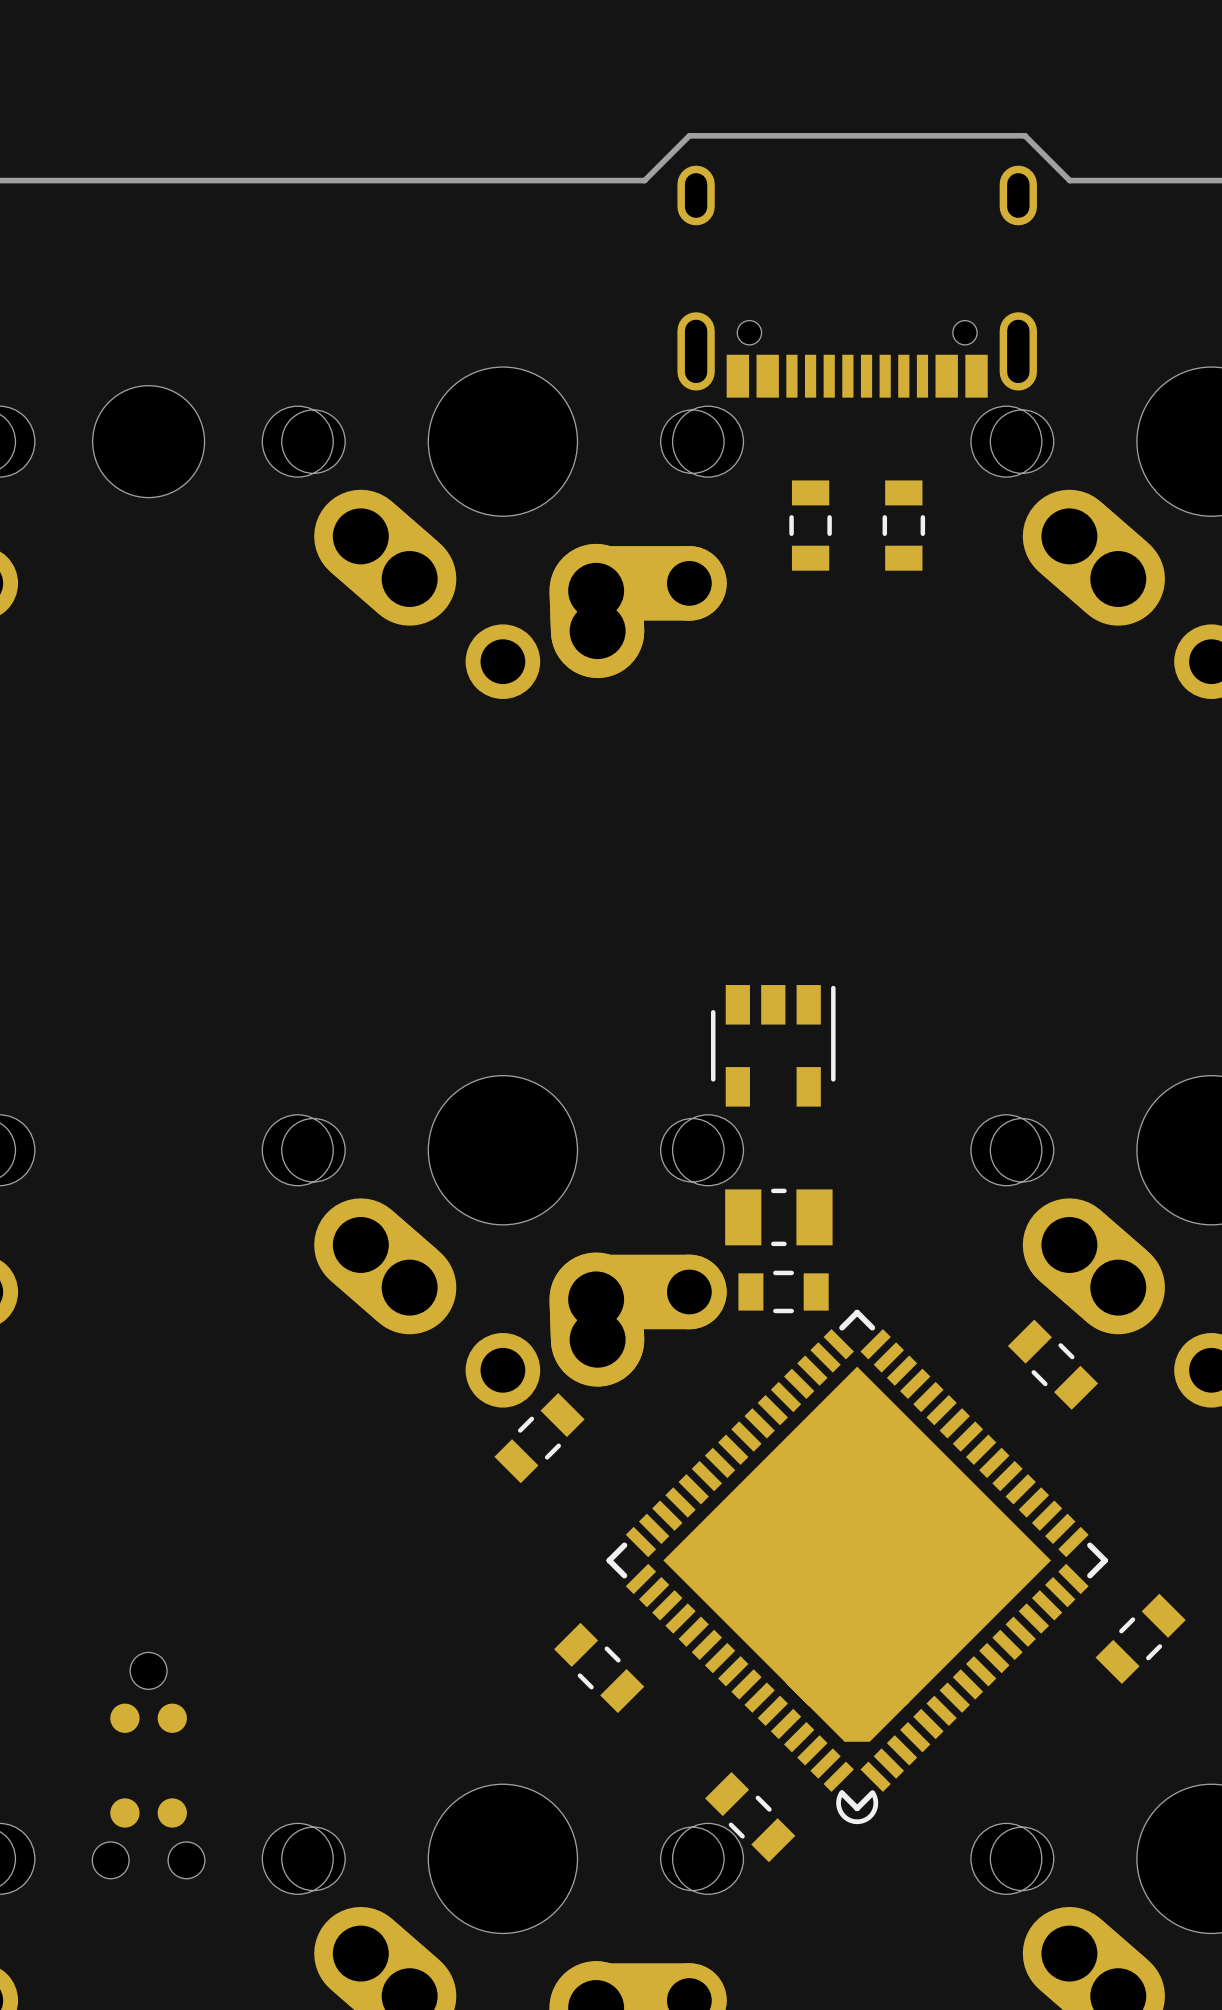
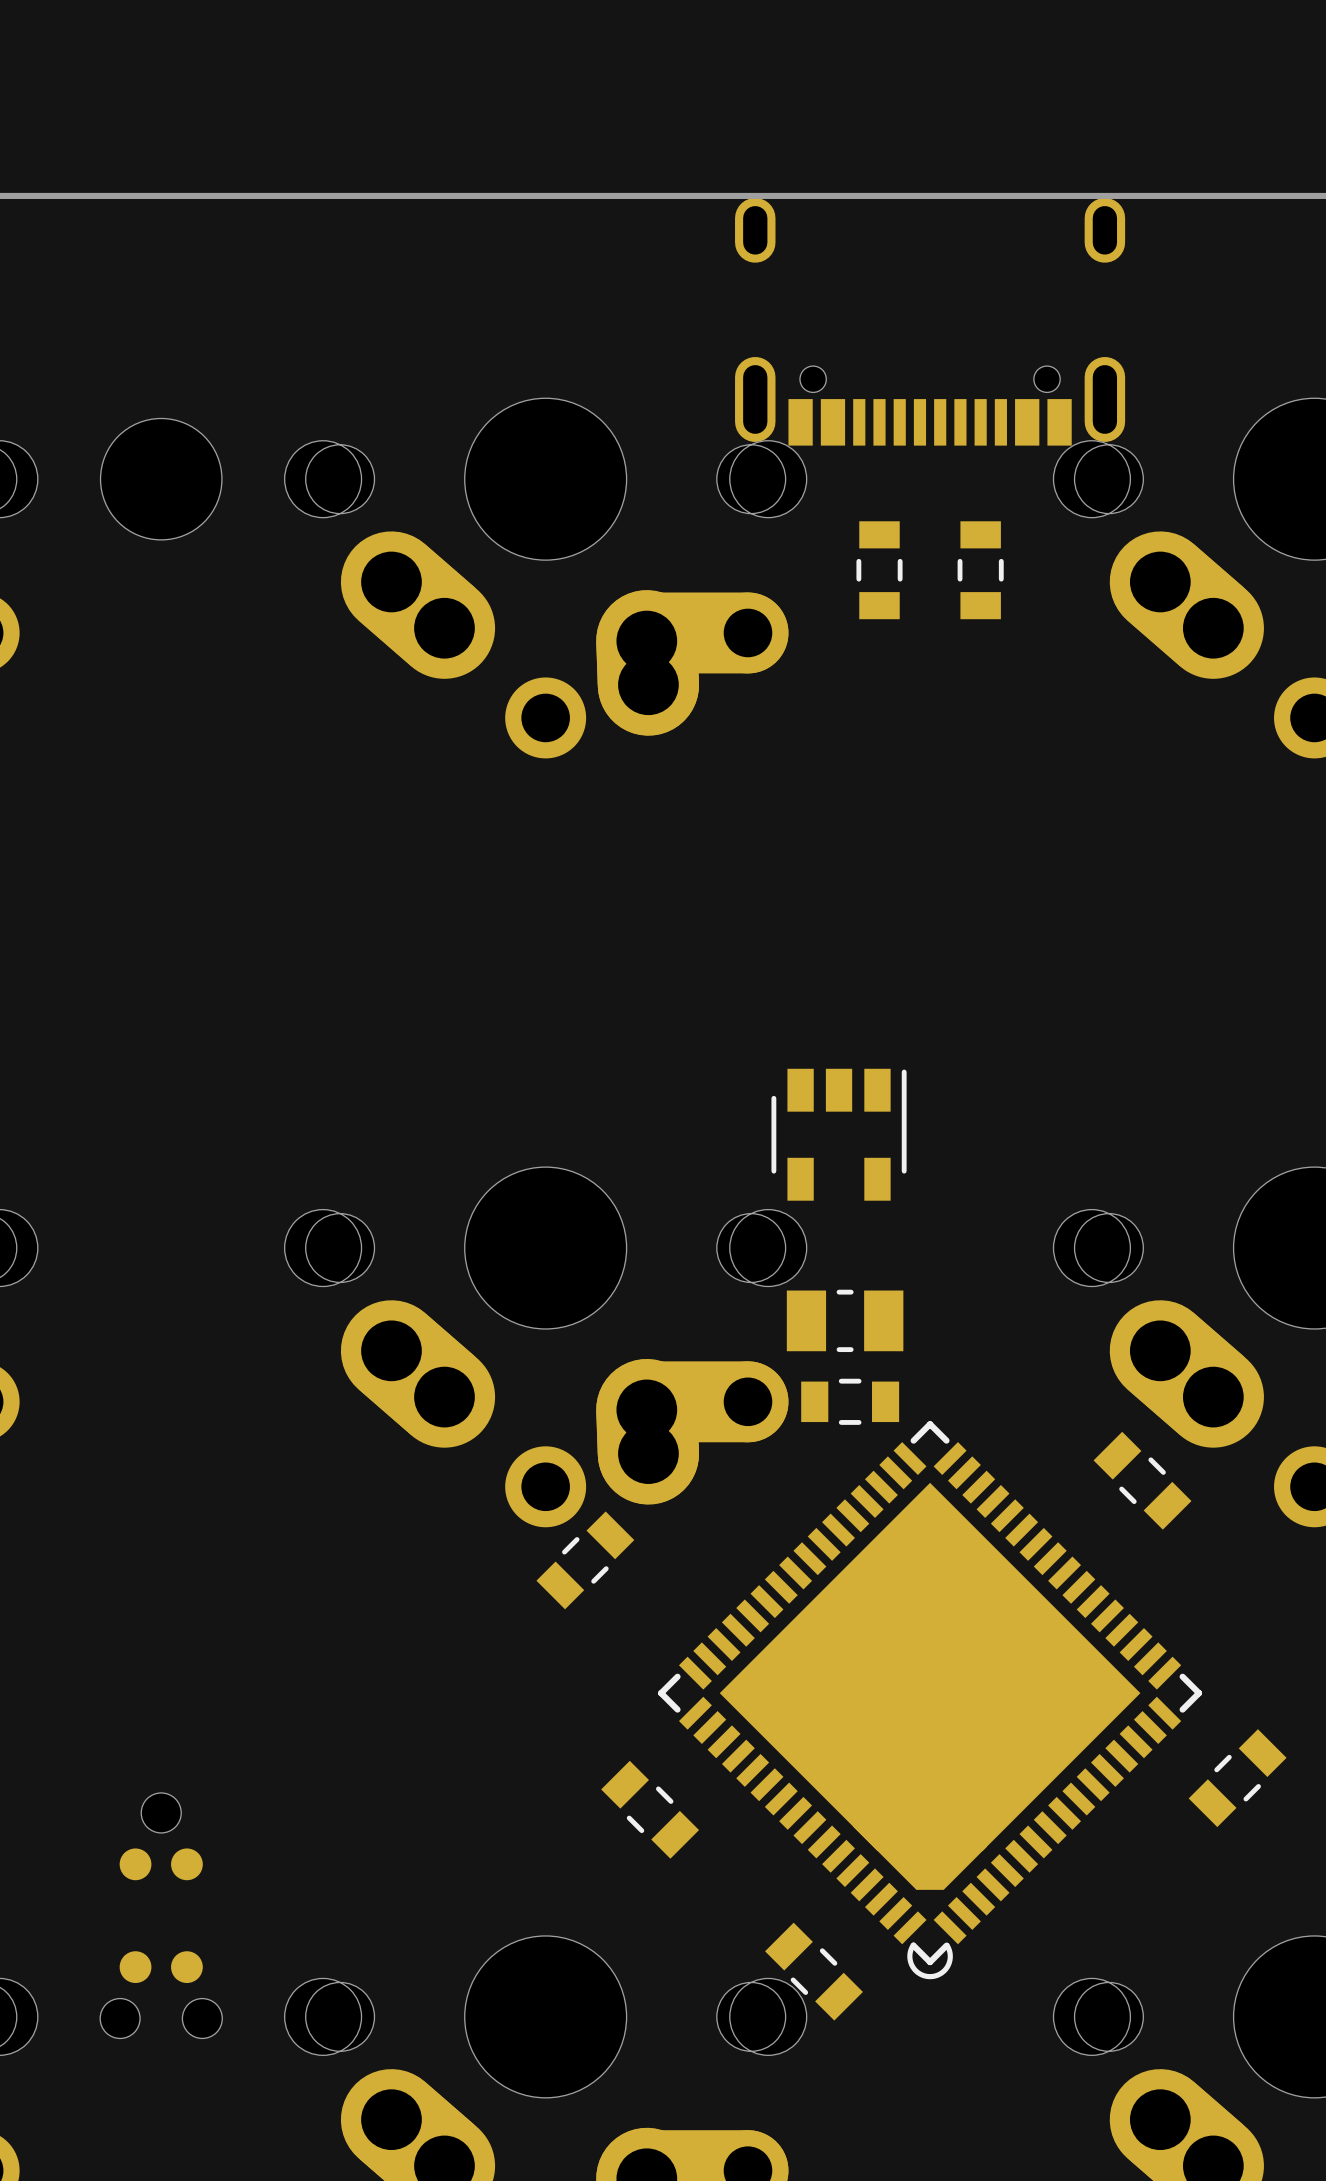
part footprint: [677, 165, 1037, 398] -> [735, 197, 1126, 446]
board edge: (644, 180) (689, 135) (1025, 135) (1069, 180) -> (699, 195) (1160, 195)

